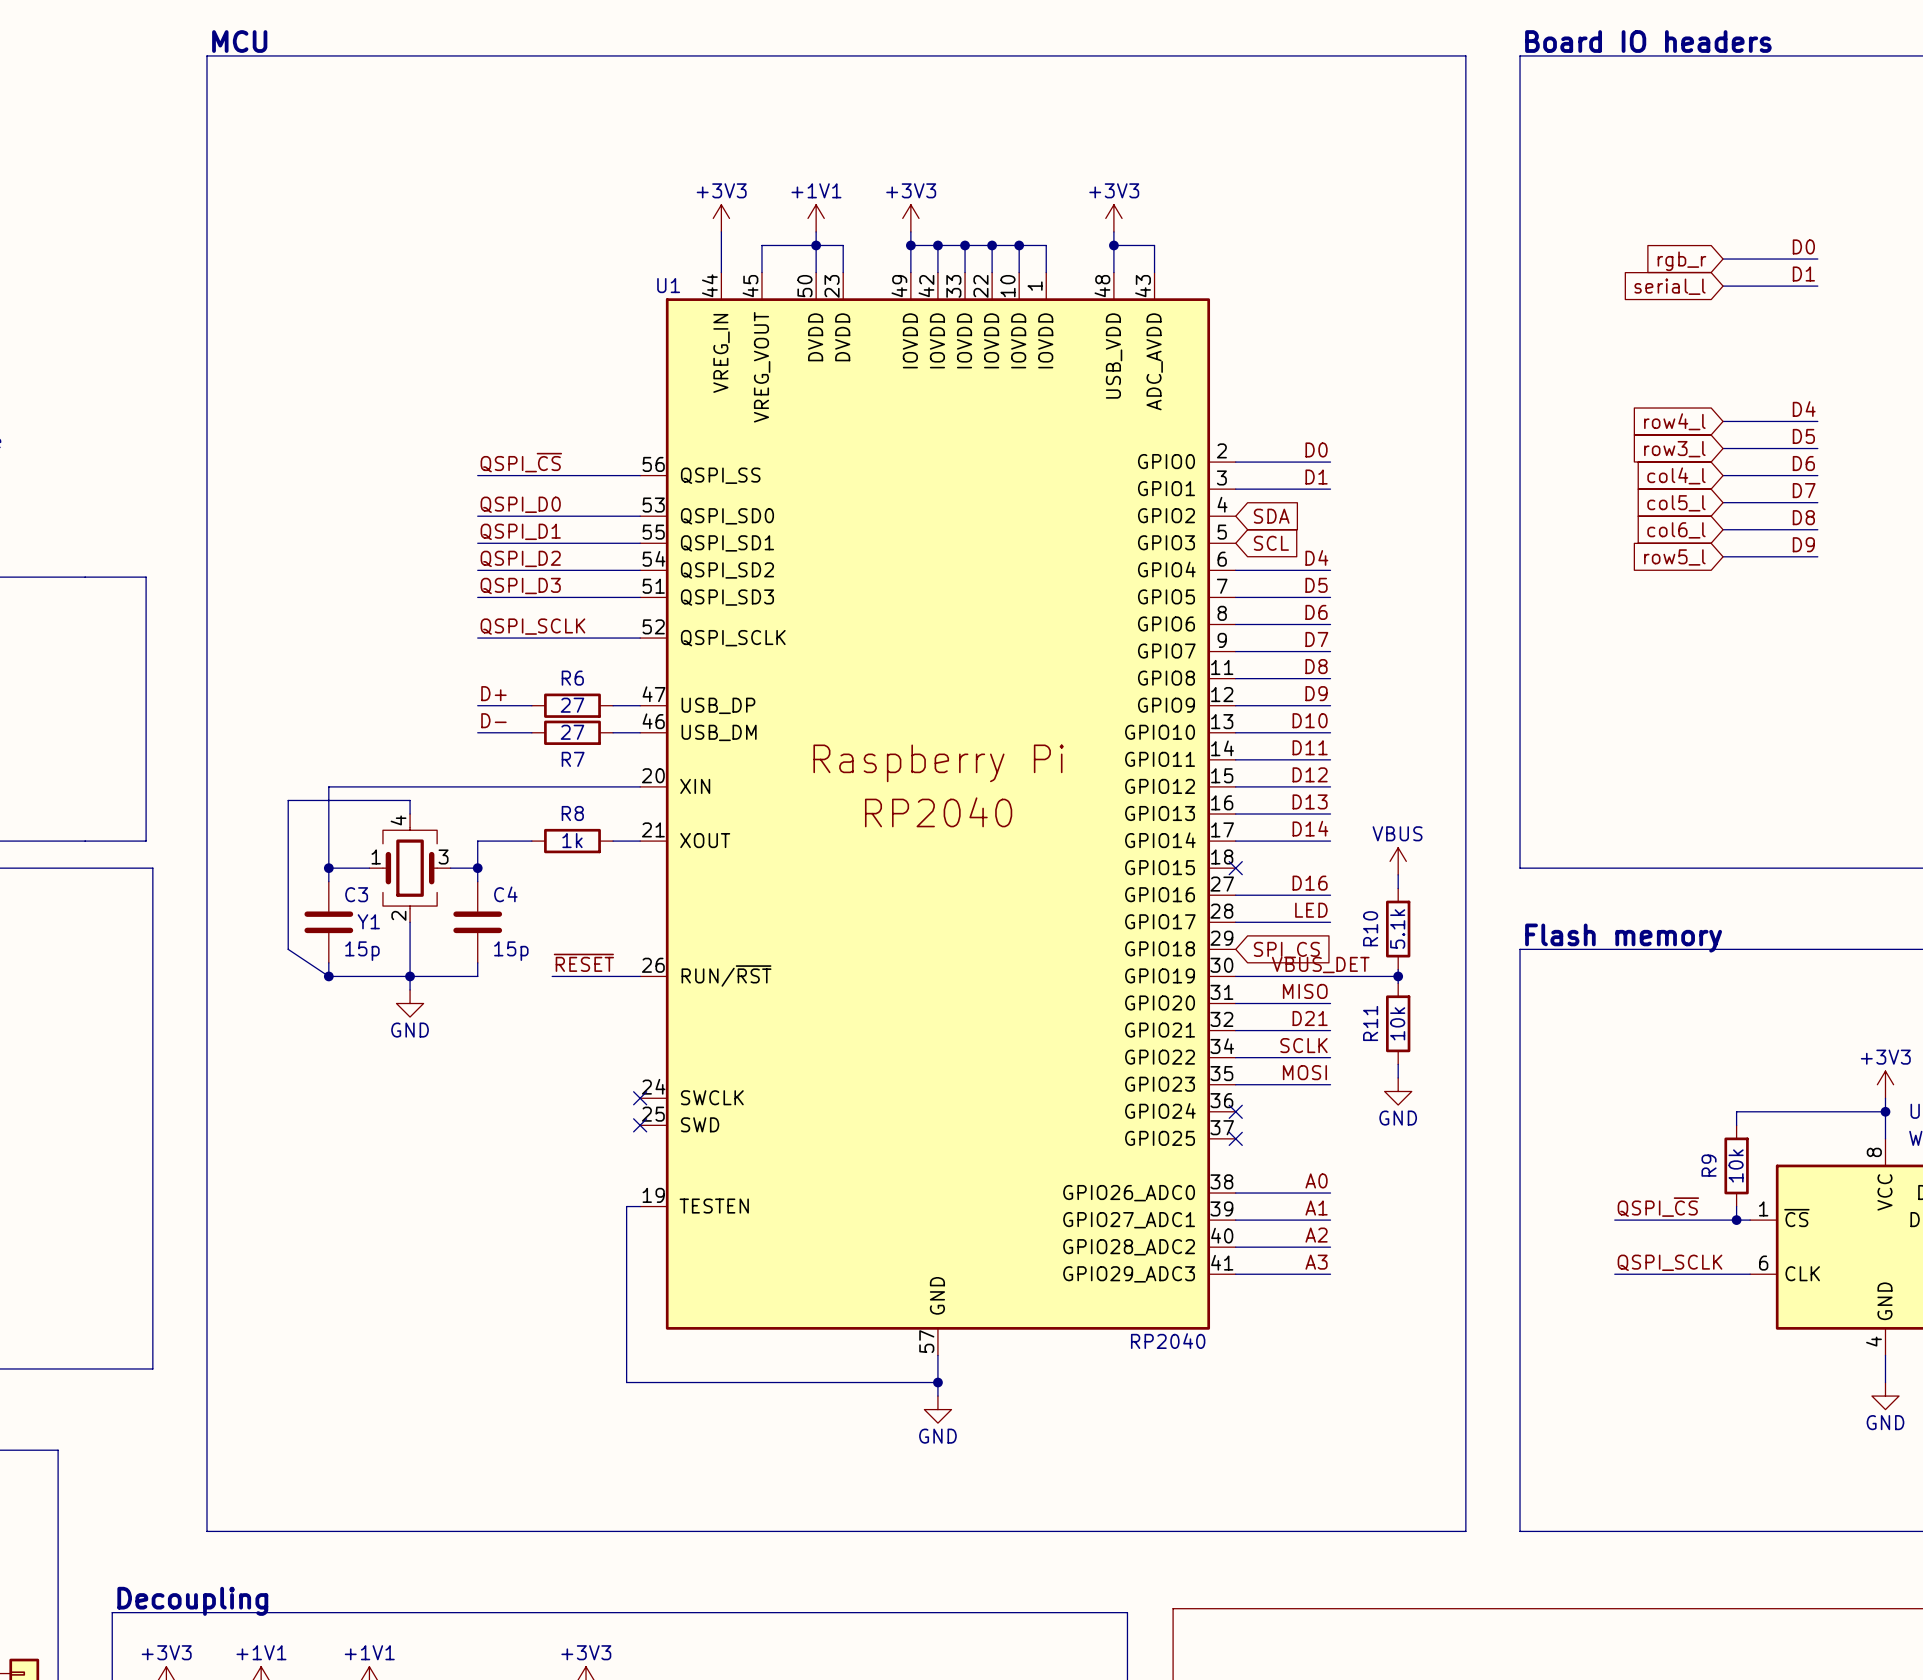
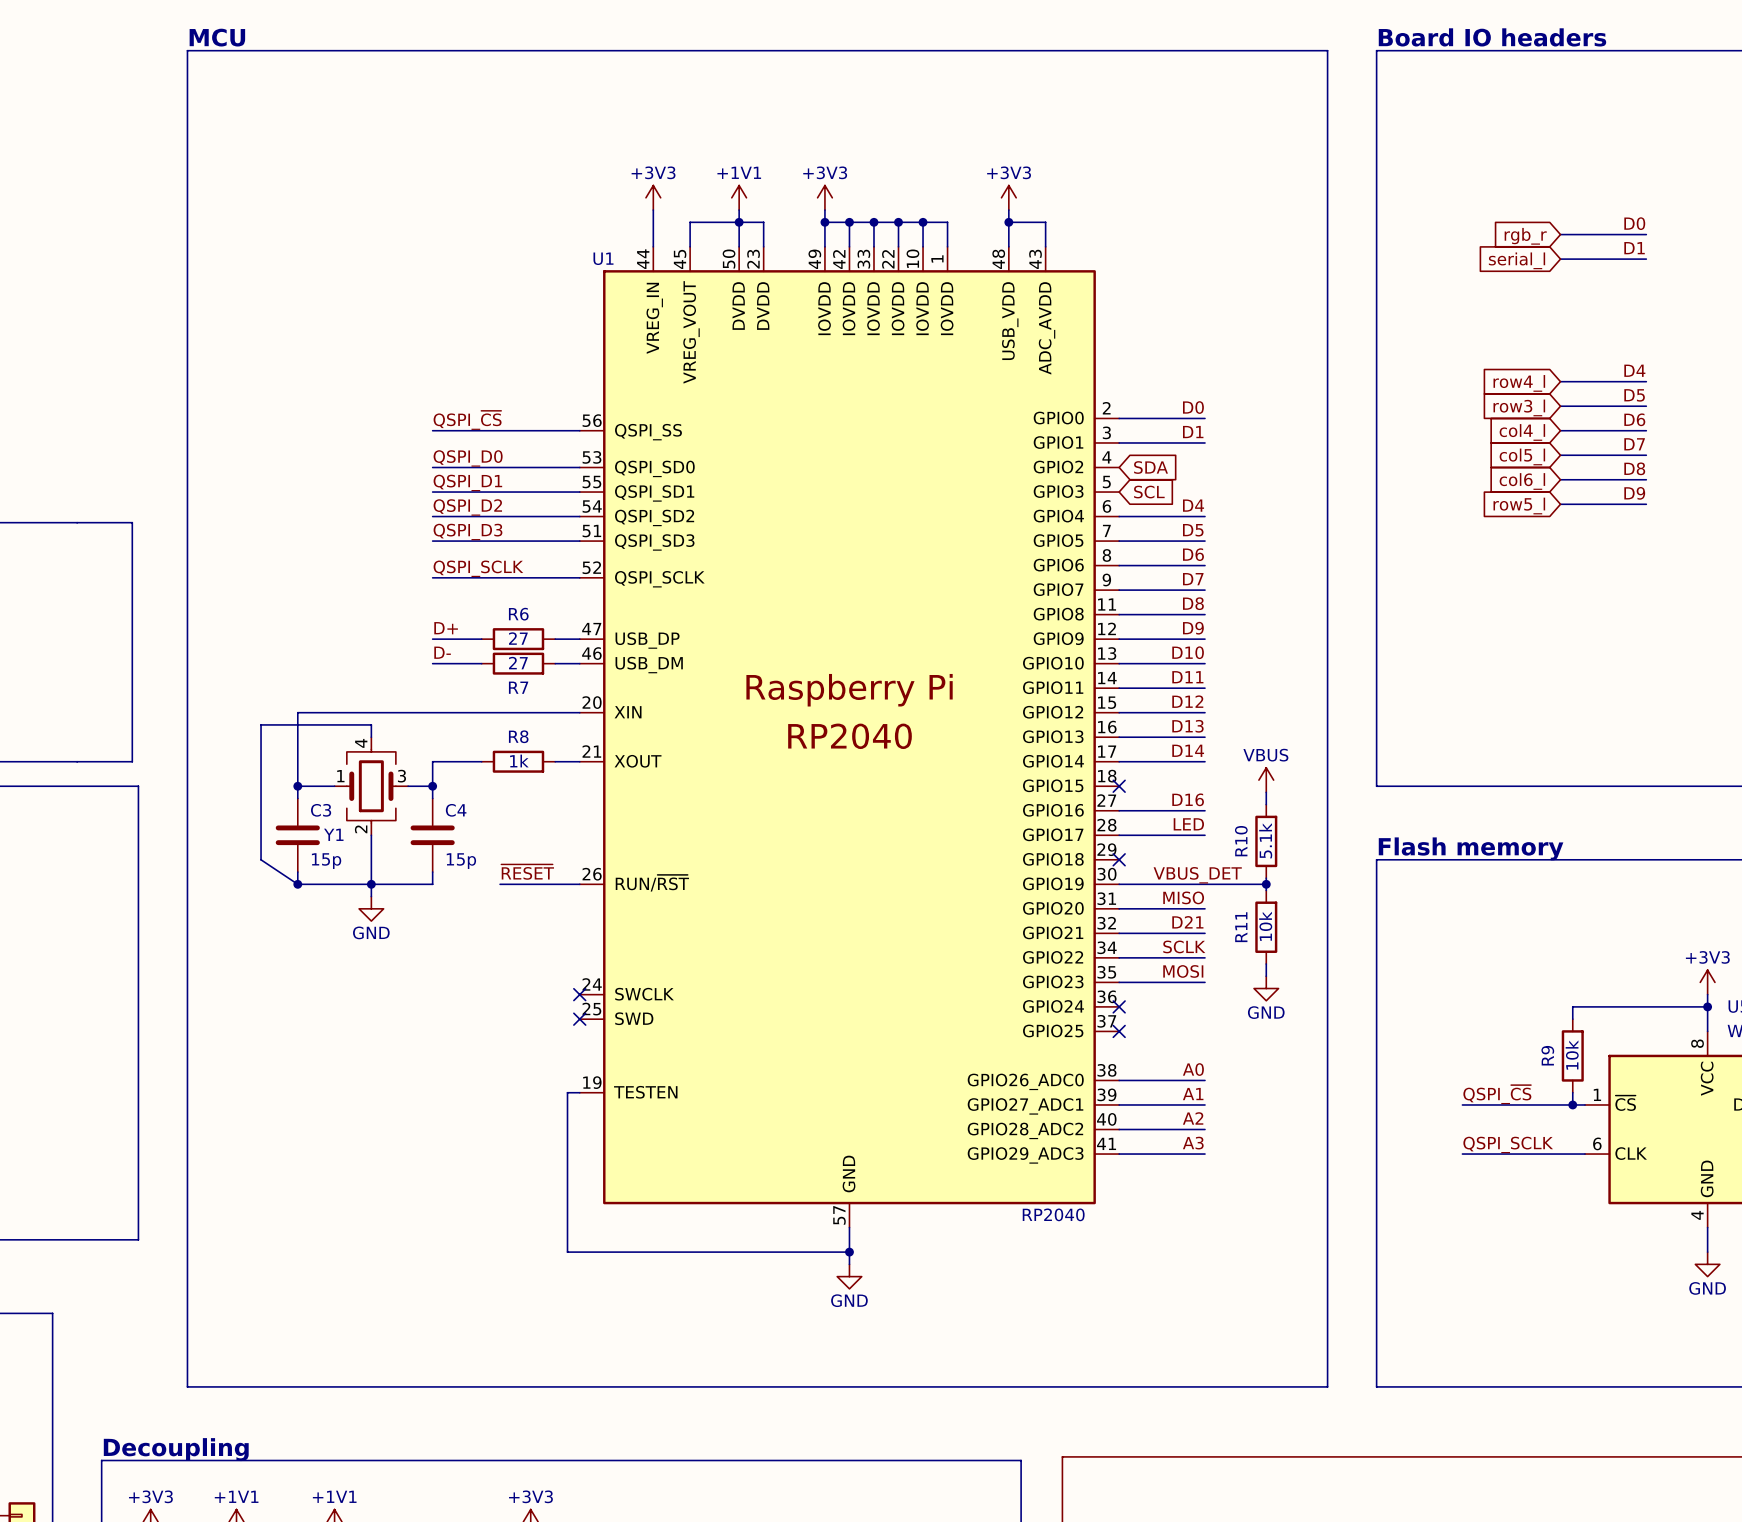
no-connect mark: none -> (1119, 859)
global label: SPI_CS (1286, 950) -> none

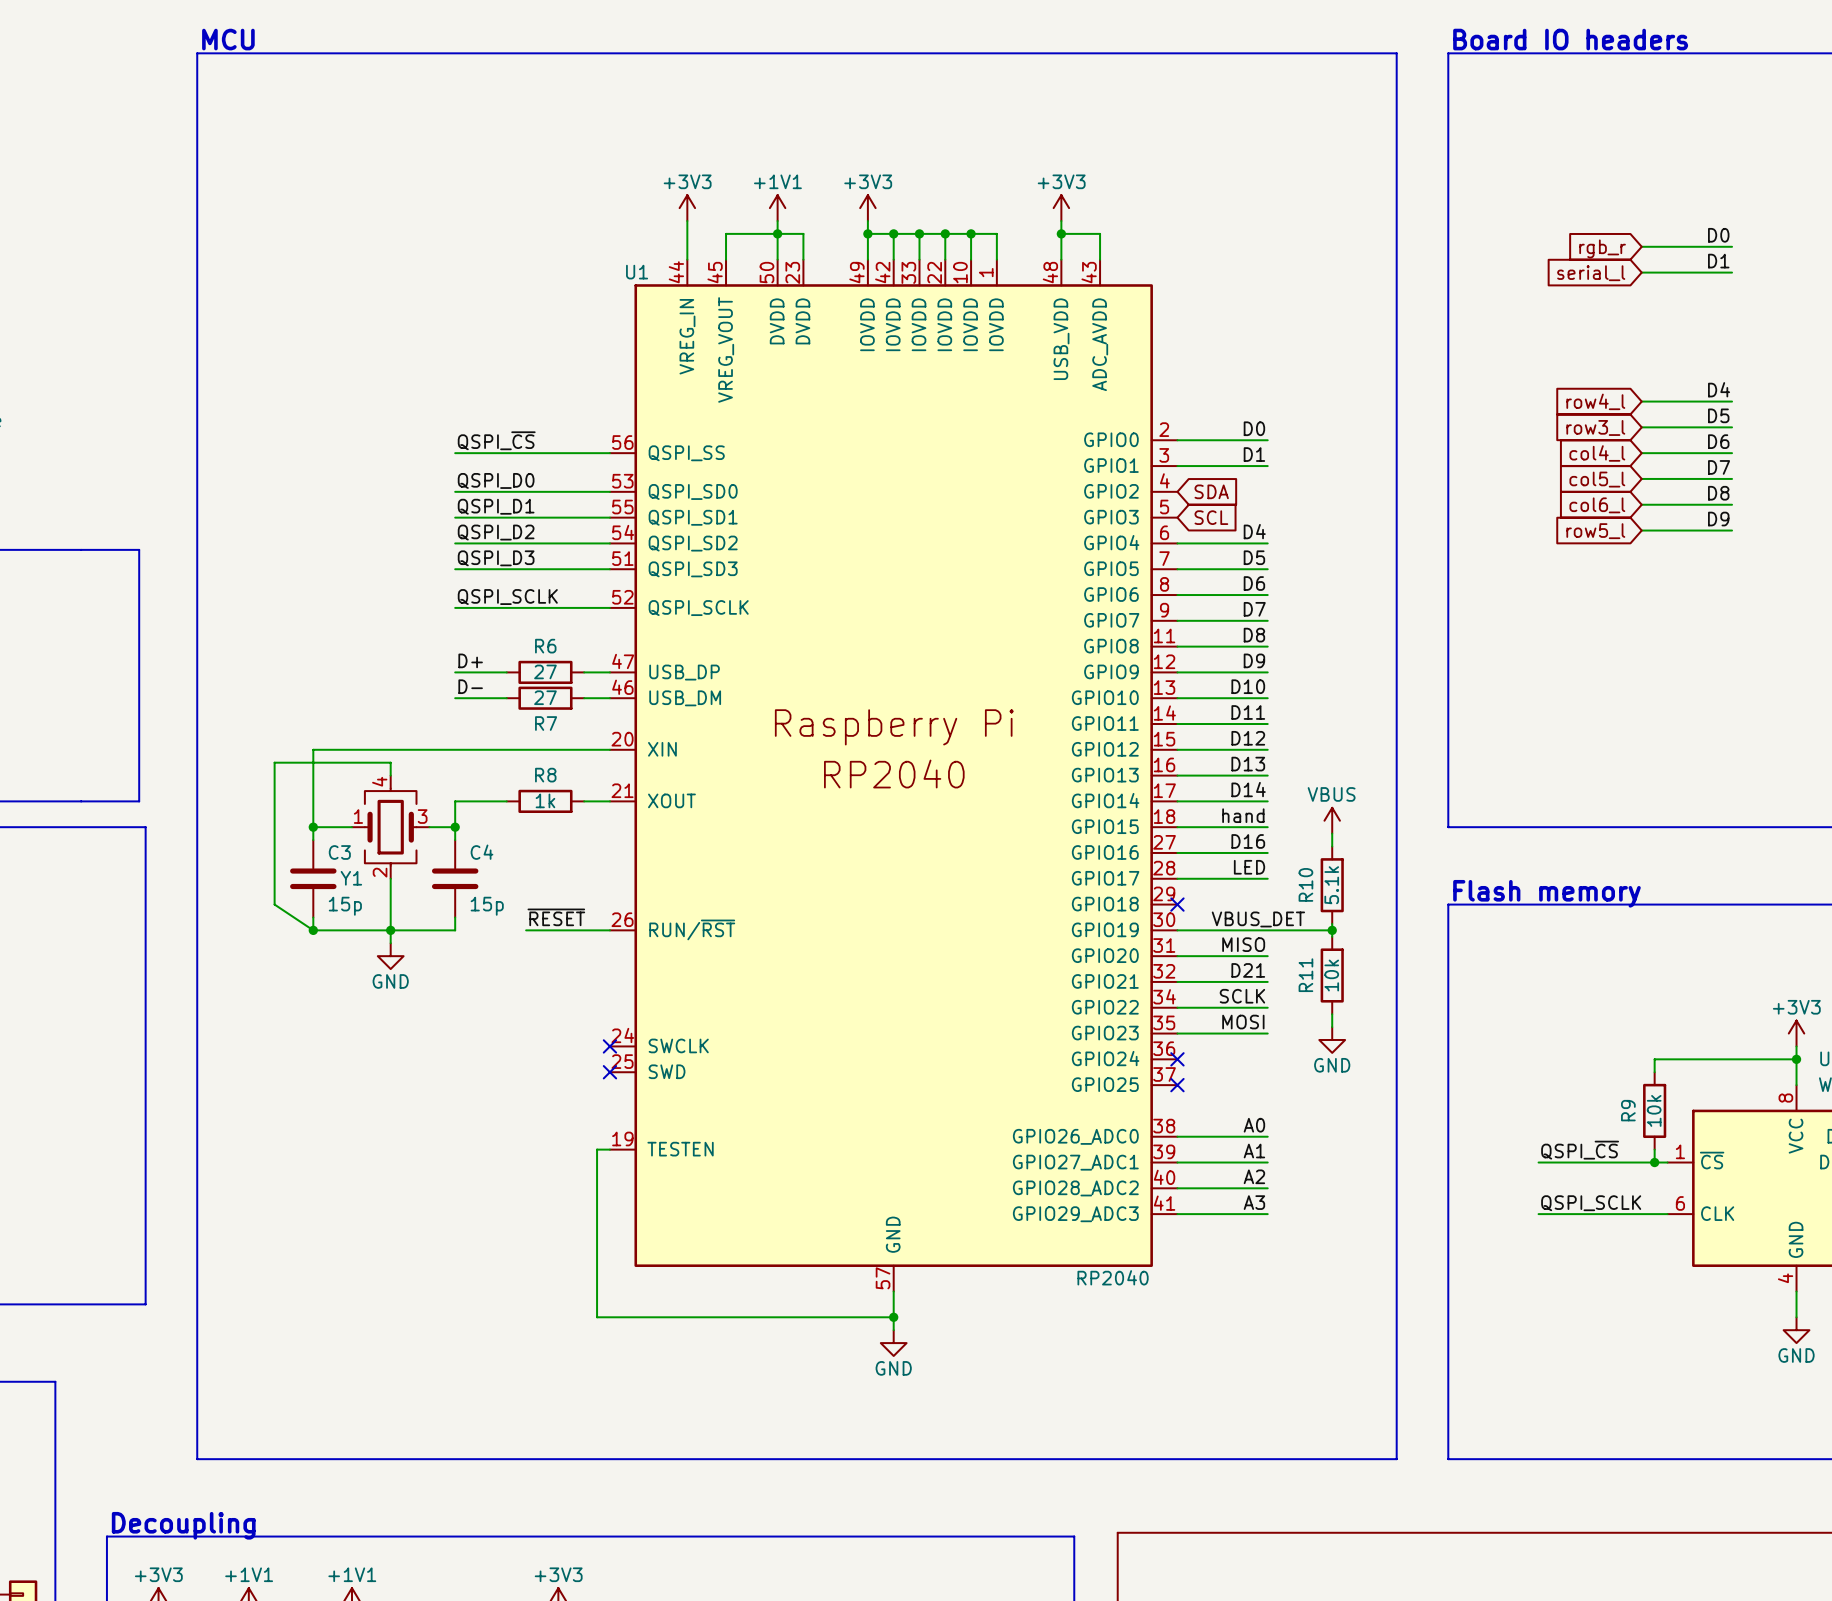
label: none -> hand (1243, 815)
wire: none -> (1177, 827) (1267, 827)
no-connect mark: (1119, 786) -> none

